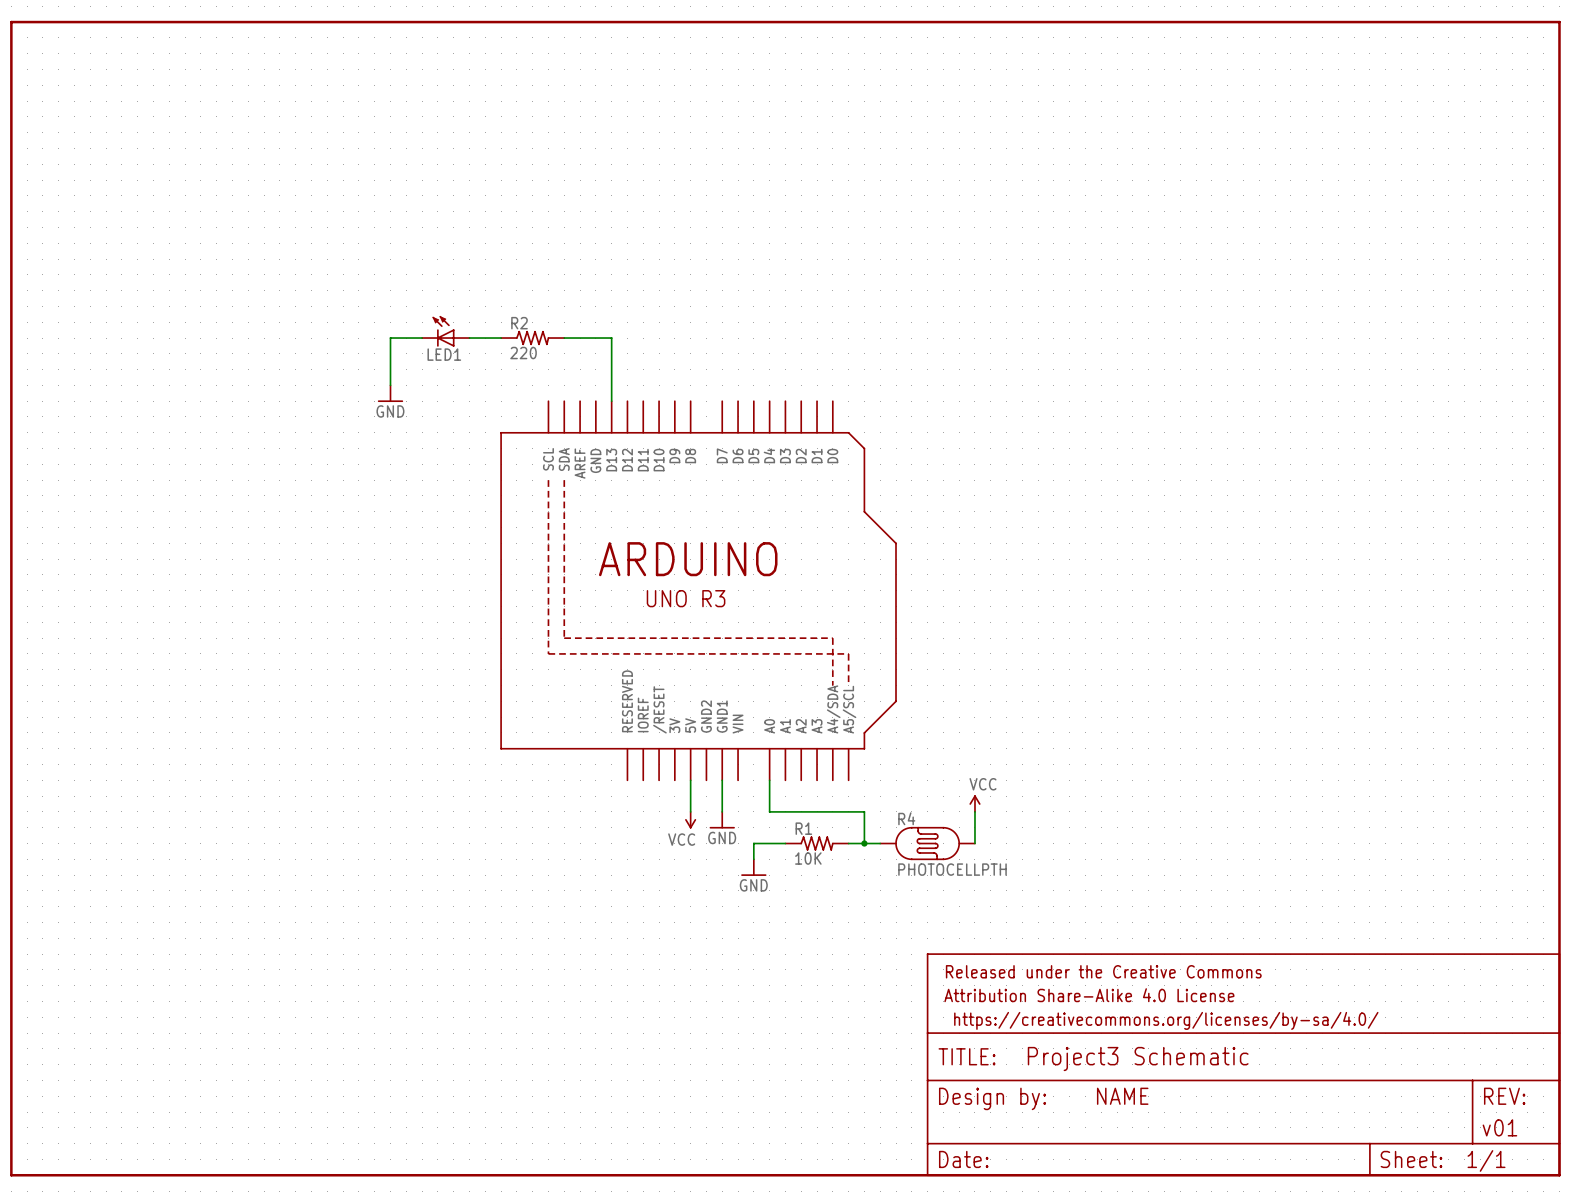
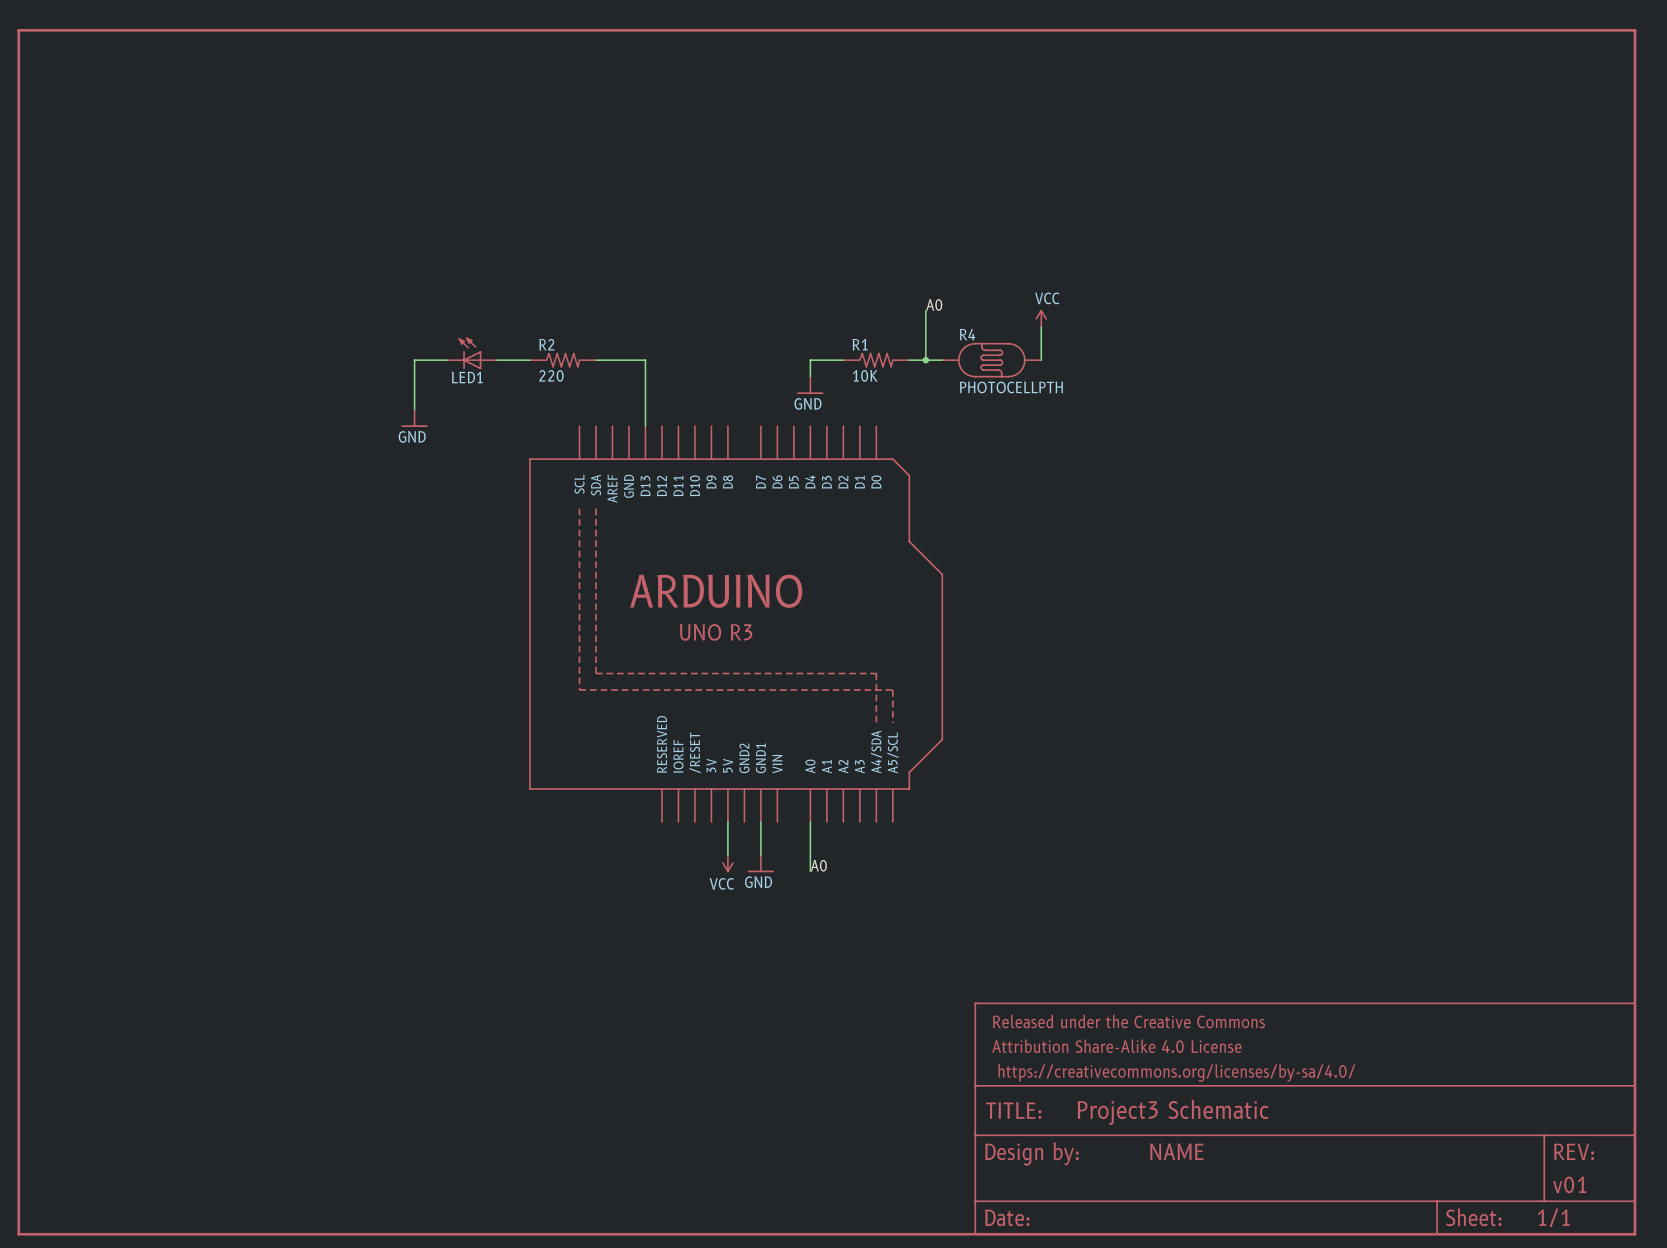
label: none -> A0 (934, 304)
wire: none -> (925, 310) (925, 360)
power symbol: none -> VCC (1041, 318)
wire: none -> (1041, 327) (1041, 360)
wire: none -> (843, 360) (810, 360) (810, 376)
wire: none -> (909, 360) (942, 360)
junction: none -> (925, 360)
power symbol: none -> GND (810, 385)
power symbol: VCC (974, 803) -> none
wire: (769, 811) (864, 811) (864, 843) -> (810, 854) (810, 871)
wire: (974, 811) (974, 843) -> none
label: none -> A0 (818, 865)
wire: (785, 843) (753, 843) (753, 859) -> none
R1 position: (817, 843) -> (876, 360)
wire: (848, 843) (880, 843) -> none
junction: (864, 843) -> none
R4 position: (927, 843) -> (991, 360)
power symbol: GND (753, 867) -> none

